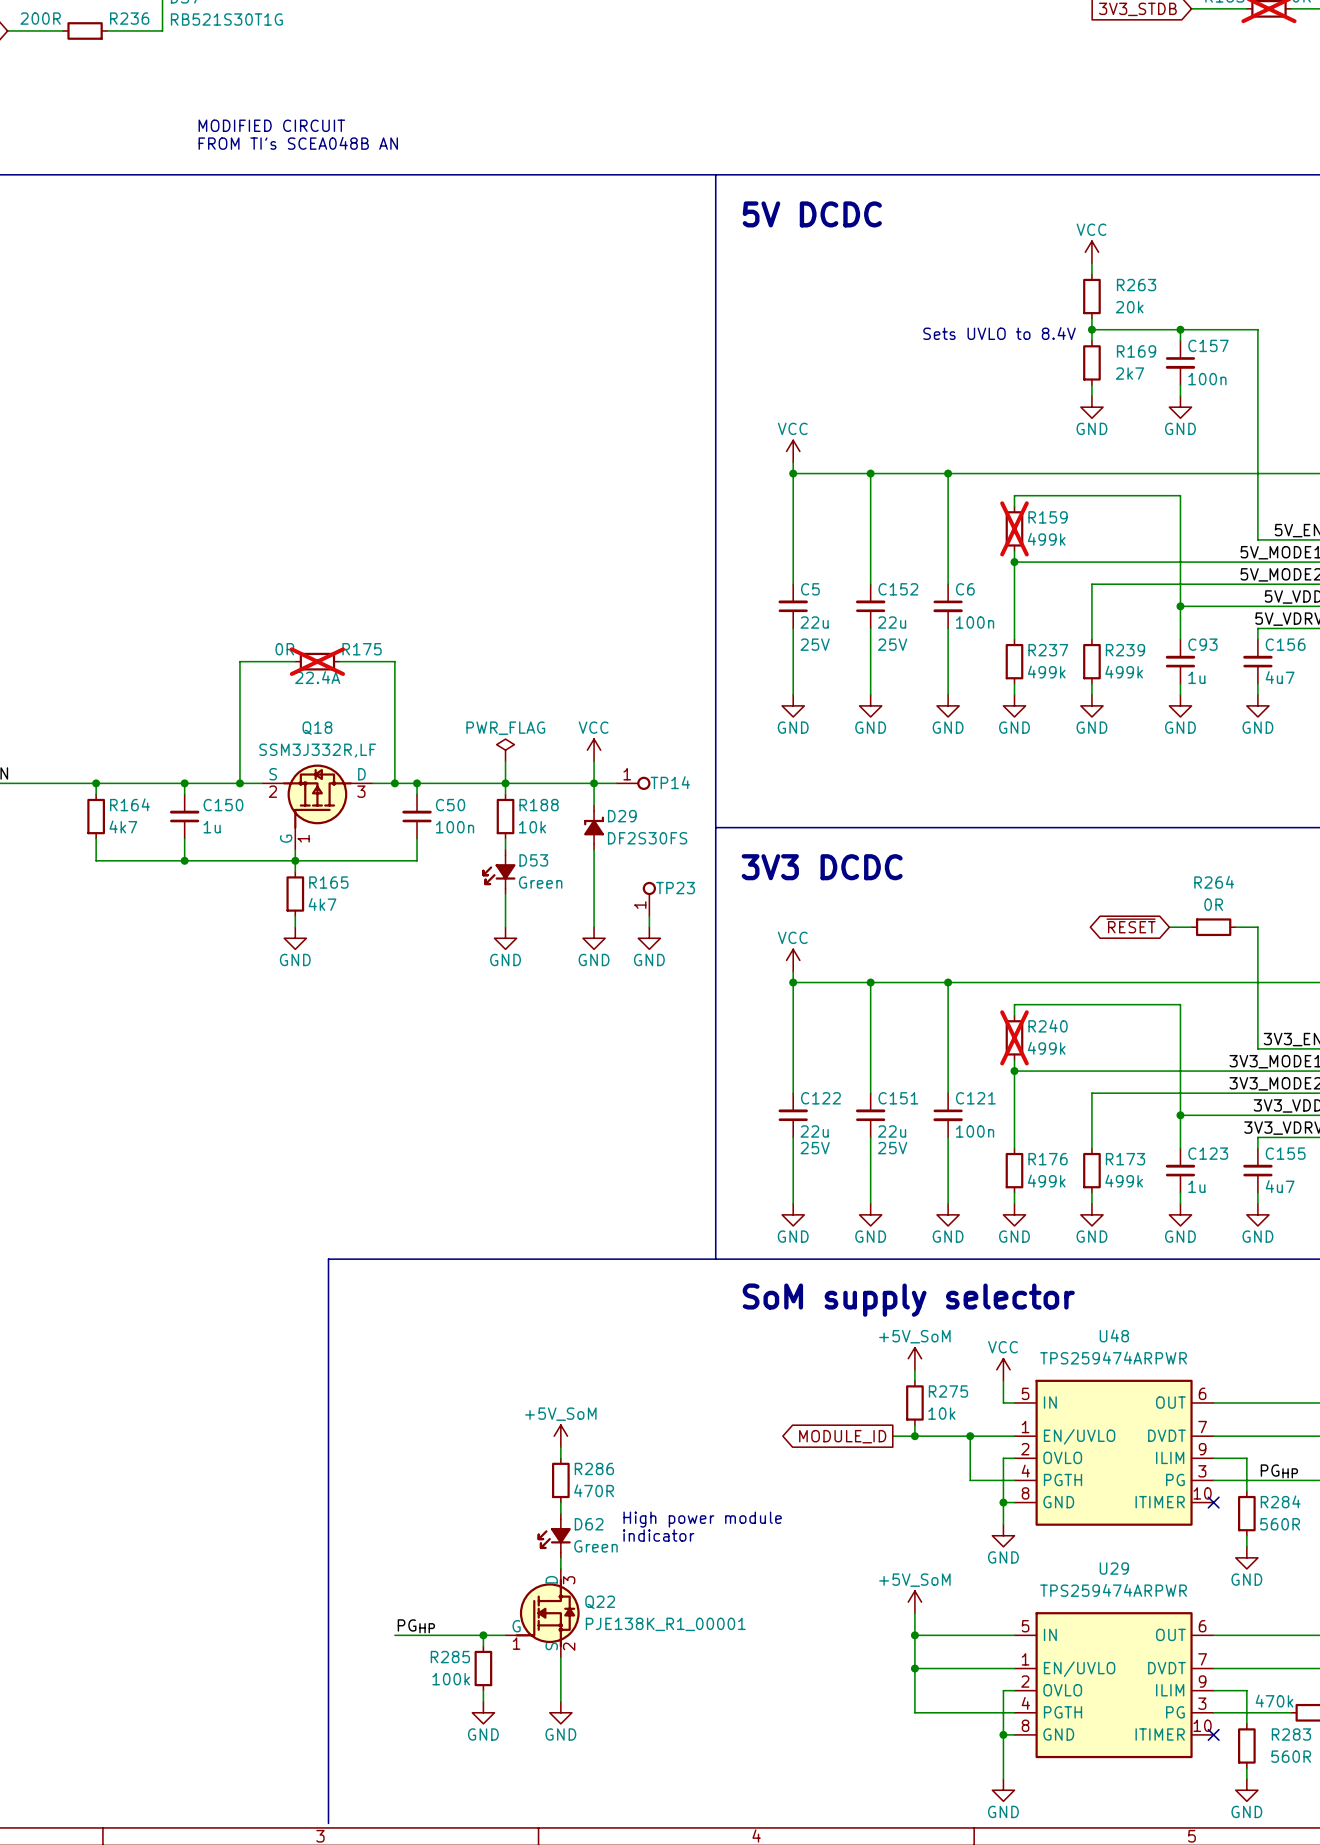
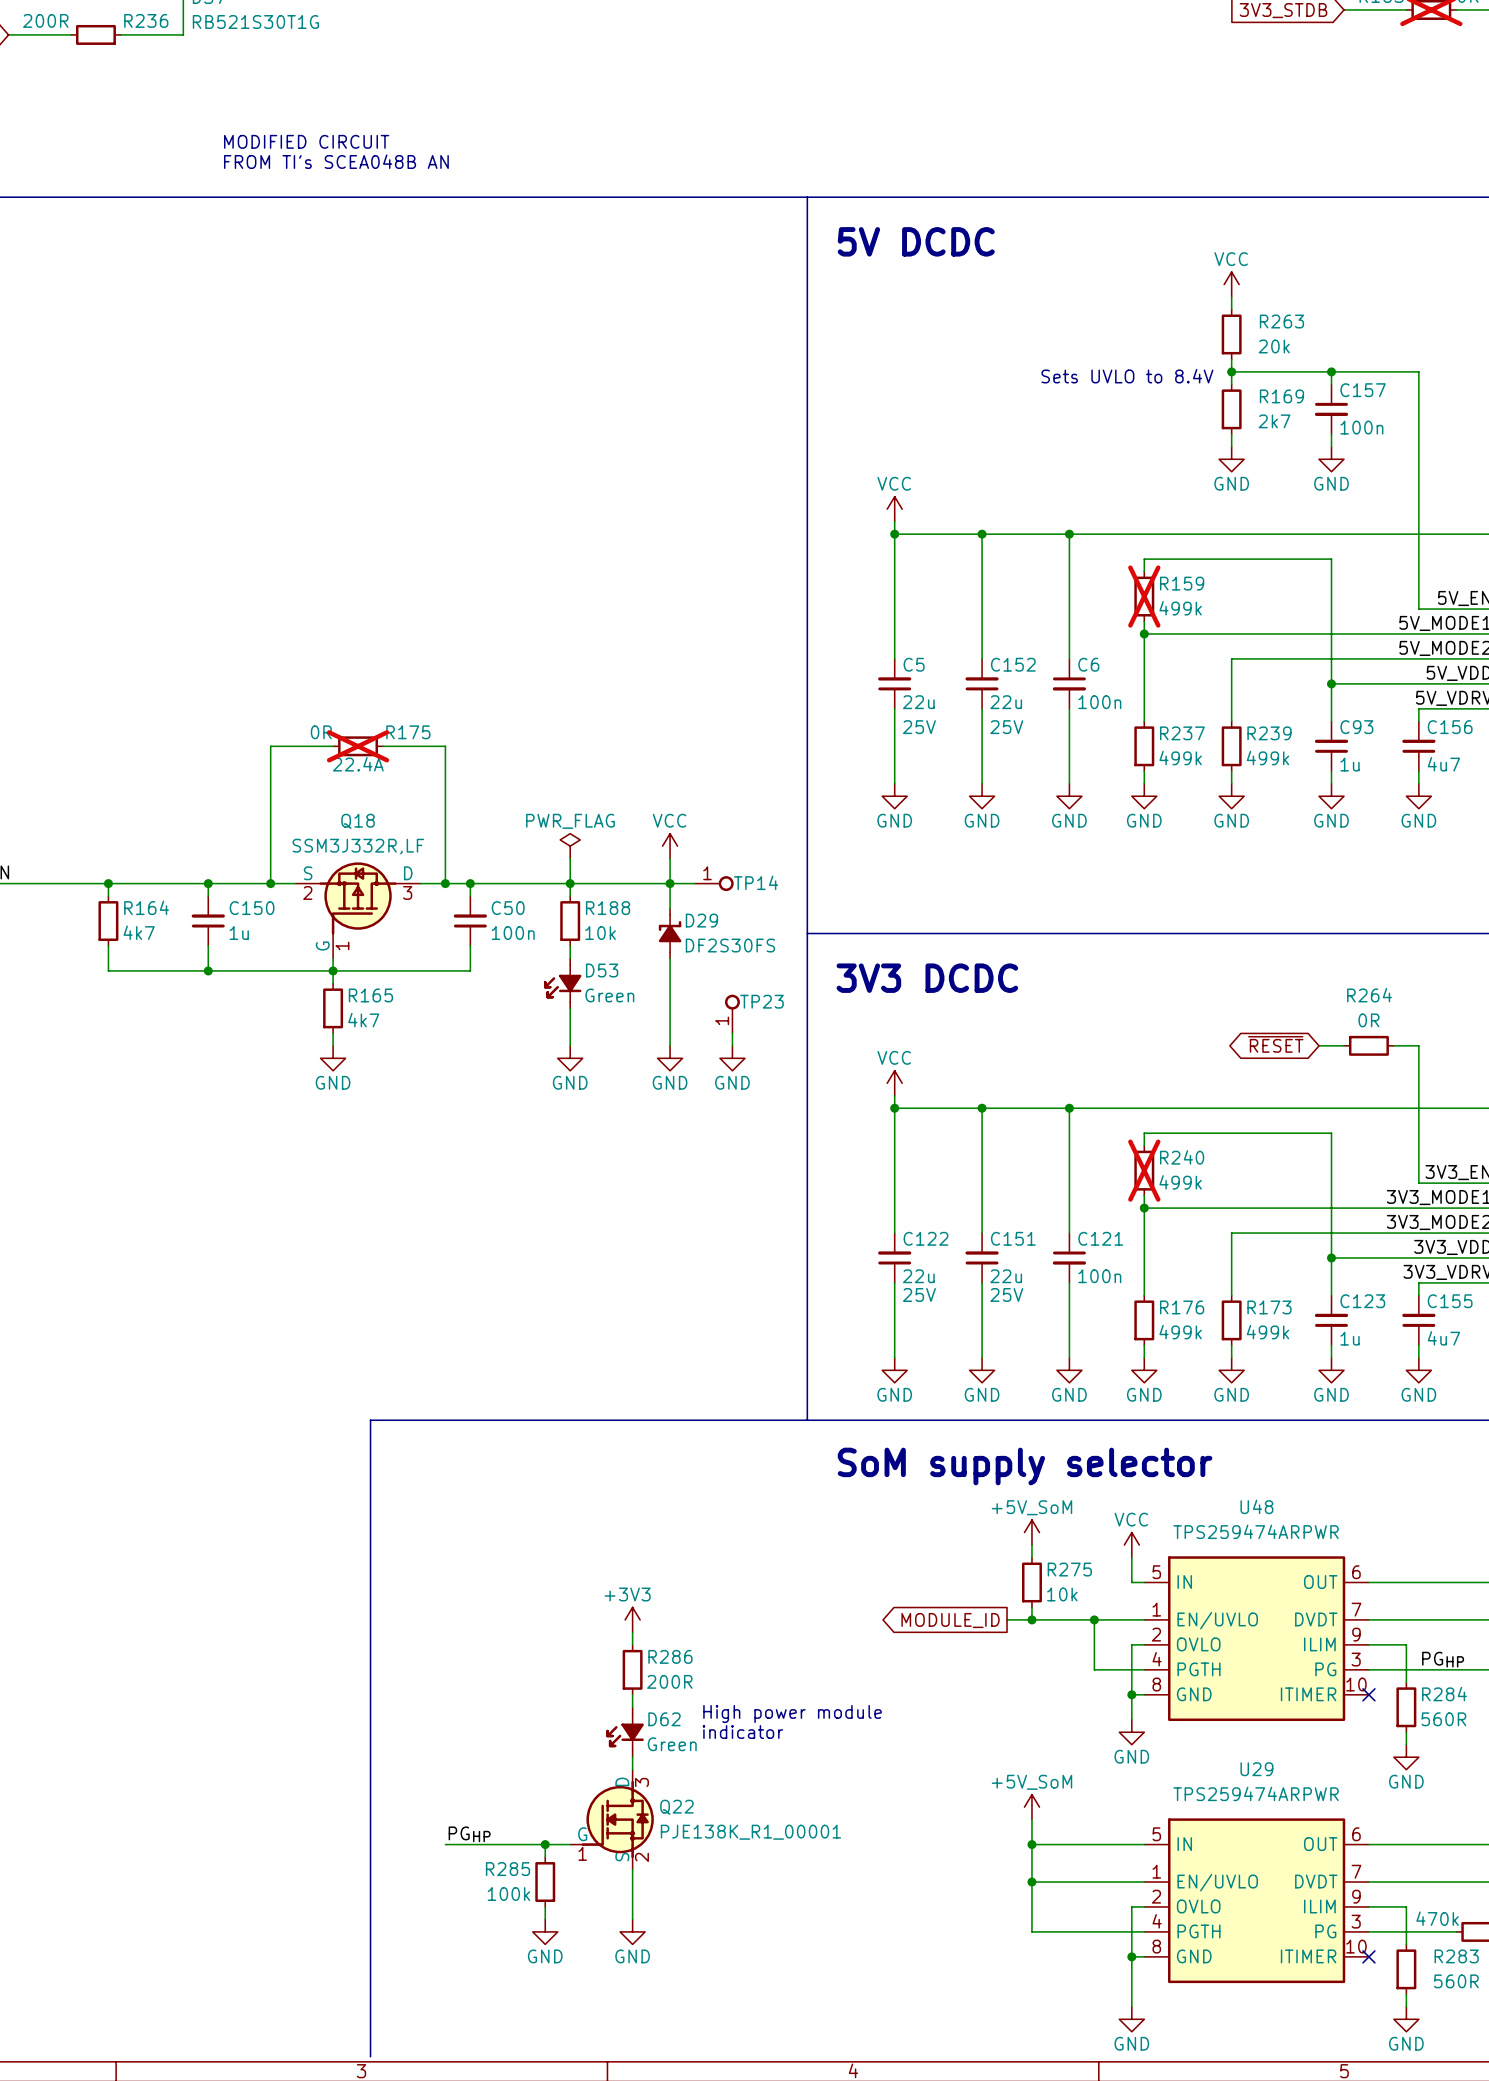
power symbol: +5V_SoM (560, 1436) -> +3V3 (632, 1619)
R286 text: 470R (594, 1490) -> 200R (669, 1681)

